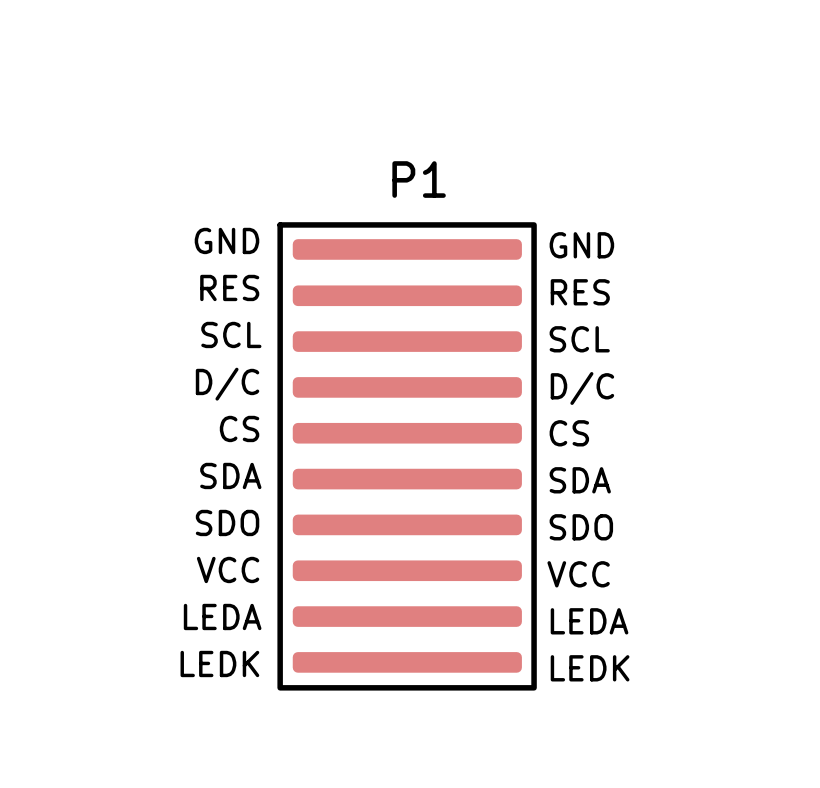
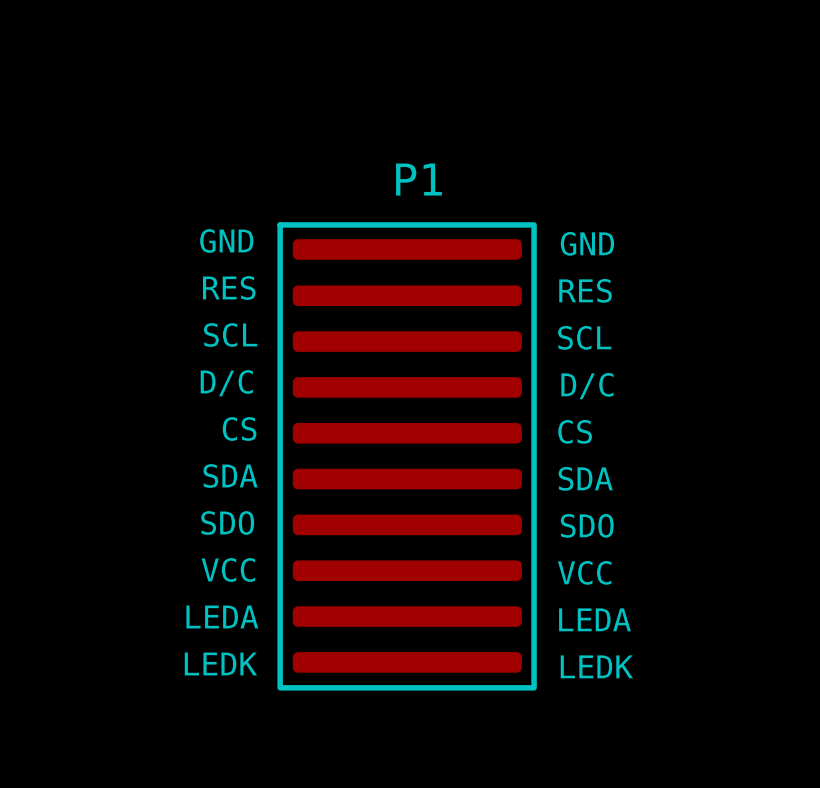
P1 footprint: [277, 222, 537, 691] -> [277, 222, 537, 691]

